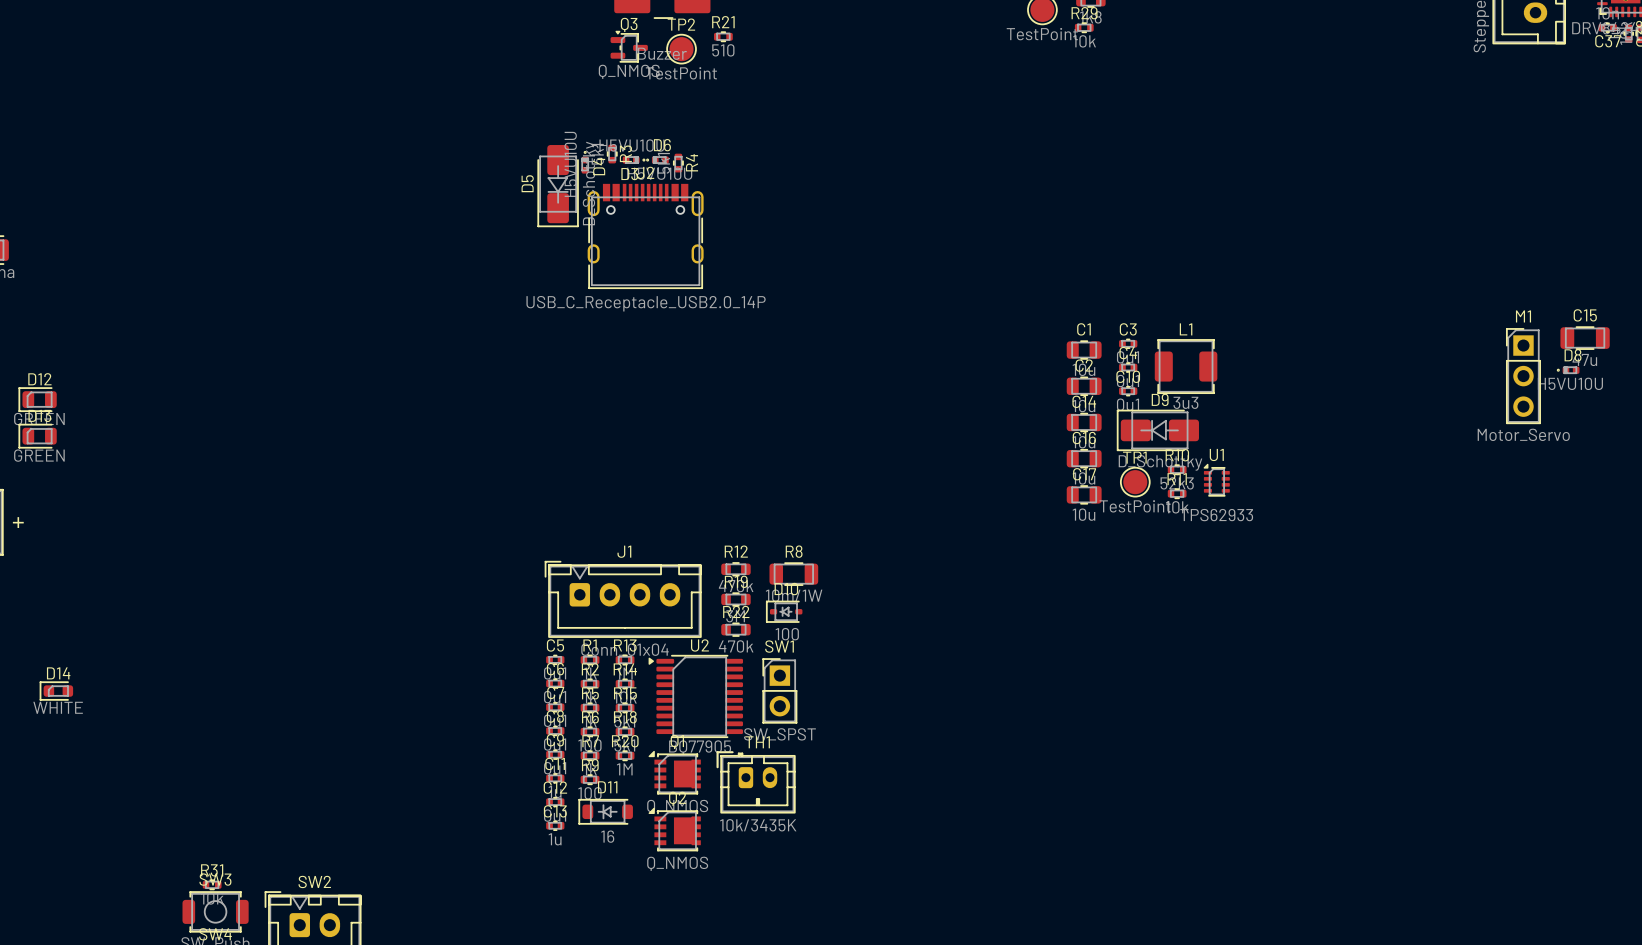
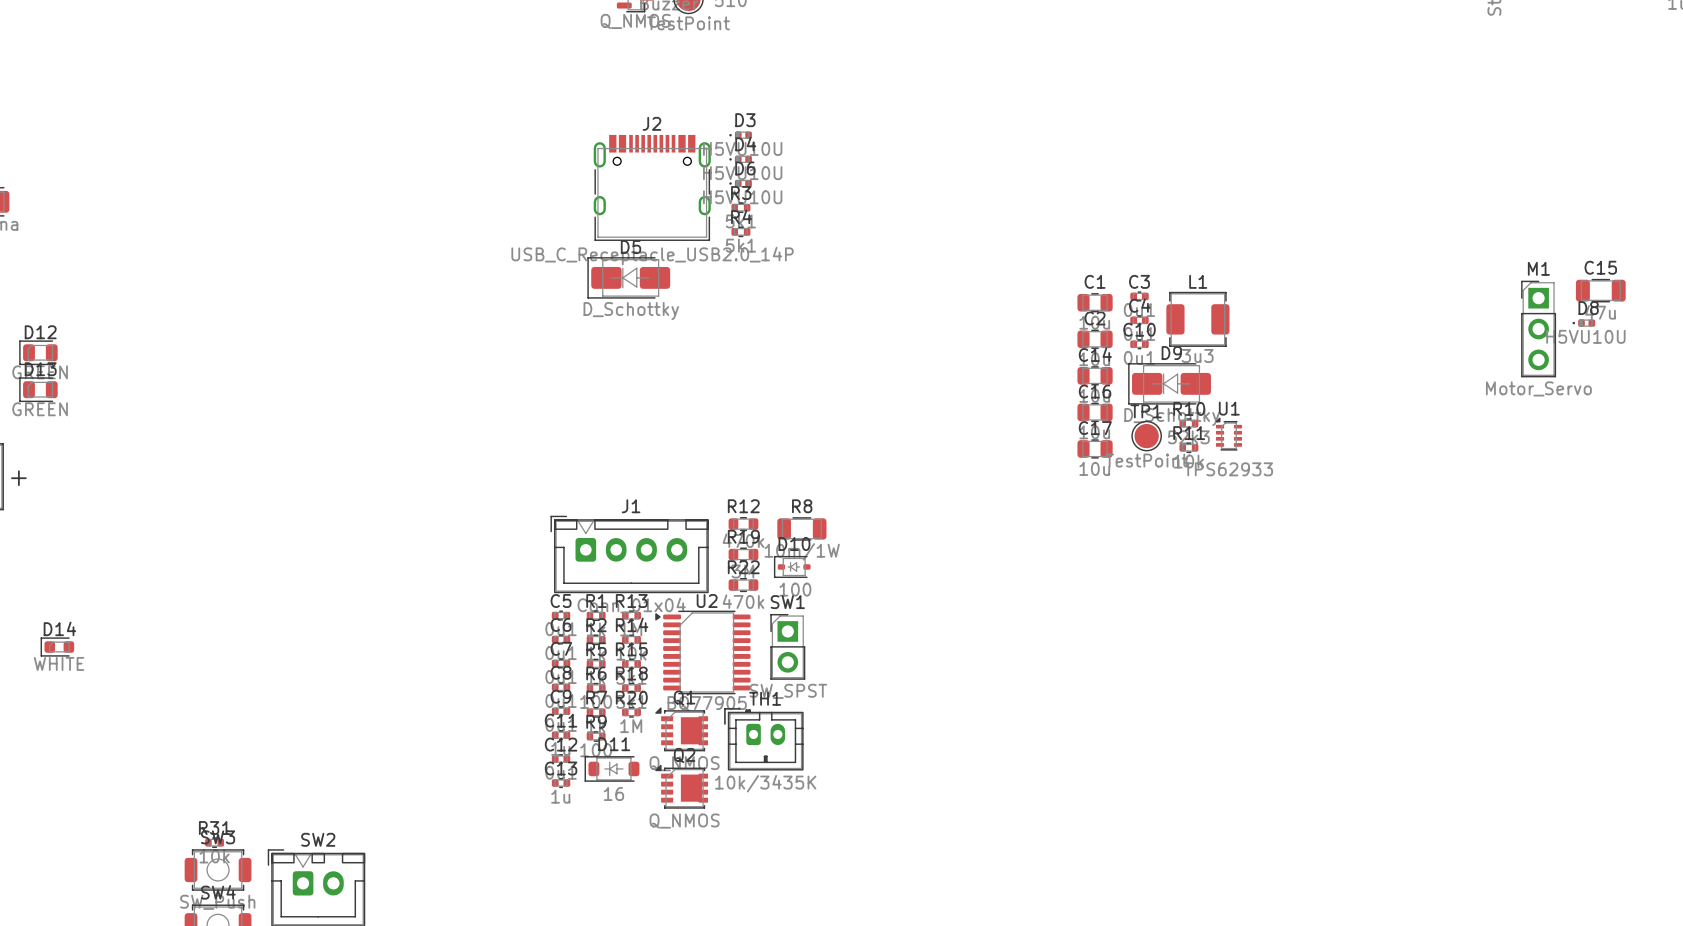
R3 rotation: 0° (612, 154) -> 90° clockwise (740, 207)
R3 position: (612, 154) -> (740, 207)
D3 rotation: 0° (633, 160) -> 180° (740, 135)
D3 position: (633, 160) -> (740, 135)
D6 position: (657, 160) -> (740, 183)
D4 rotation: 0° (585, 162) -> 90° counterclockwise (740, 159)
D4 position: (585, 162) -> (740, 159)
R4 rotation: 0° (678, 163) -> 90° clockwise (740, 231)
R4 position: (678, 163) -> (740, 231)
D5 rotation: 0° (558, 186) -> 90° clockwise (628, 277)
D5 position: (558, 186) -> (628, 277)

